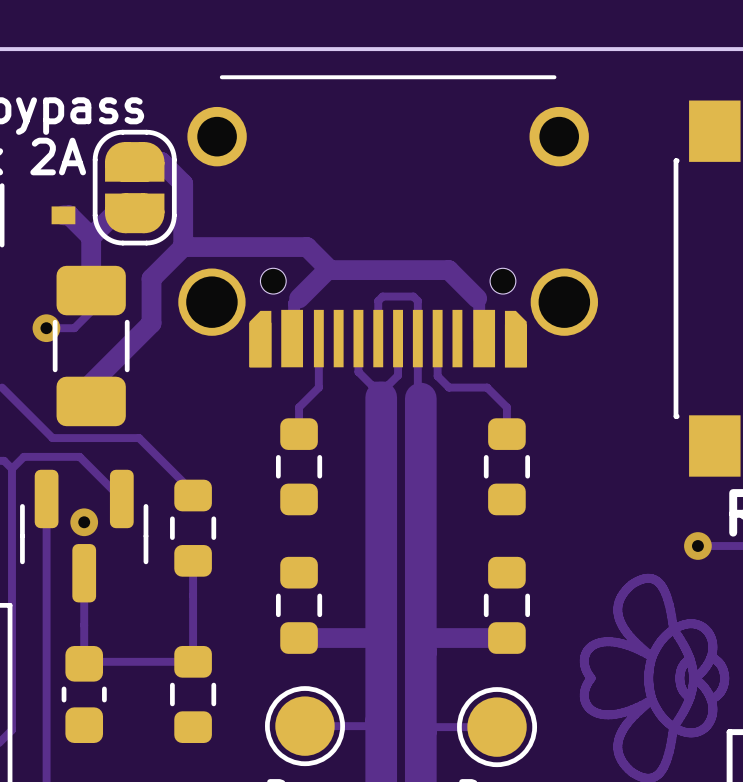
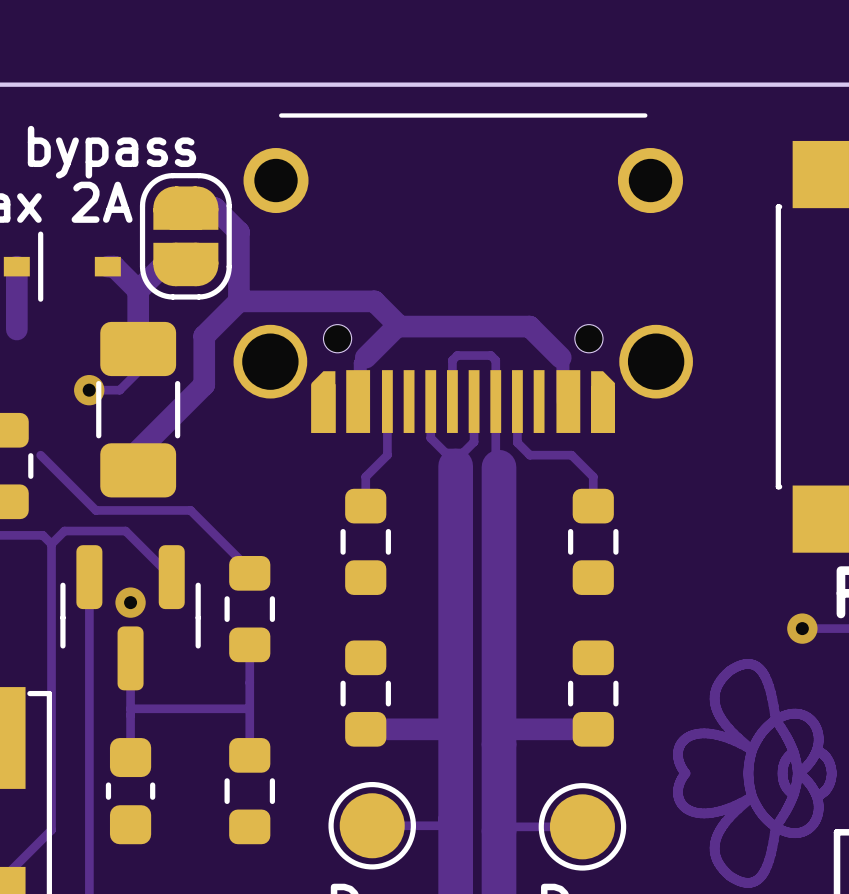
track: none -> (130, 708) (249, 708)
track: (193, 661) (86, 661) (84, 663) -> none

